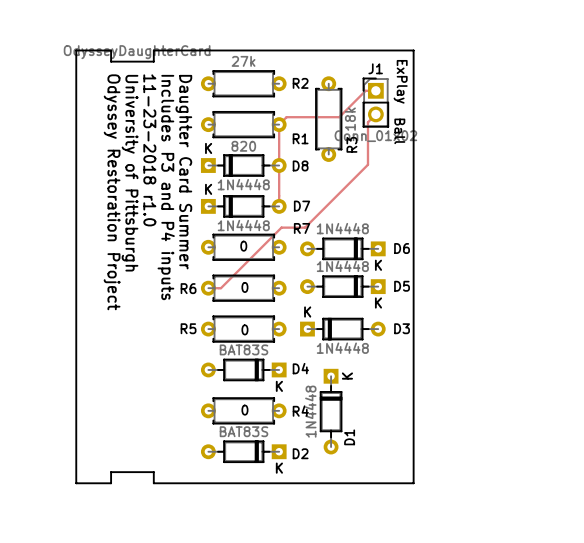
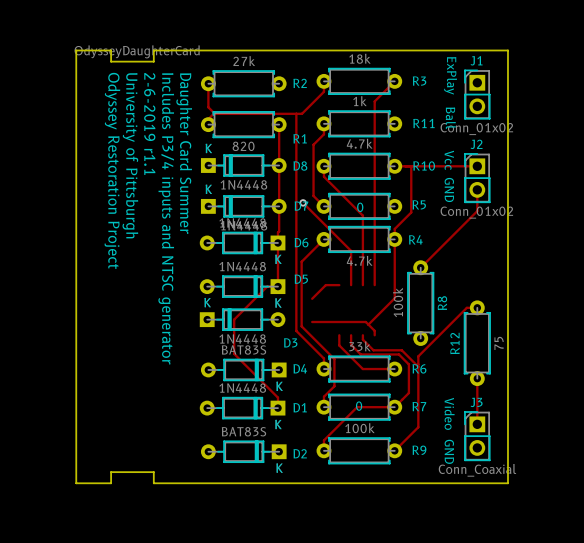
board edge: (413, 50) (413, 483) -> (413, 50) (507, 50) (507, 483) (413, 483)
track: none -> (323, 81) (323, 91) (301, 113) (213, 113) (208, 119) (208, 124)
track: none -> (394, 81) (374, 101) (374, 285)
text position: ExPlay (400, 81) -> ExPlay (450, 75)
track: none -> (208, 83) (208, 107) (214, 113)
track: (375, 90) (365, 90) (339, 117) (286, 117) (279, 124) -> none
J1 position: (375, 102) -> (477, 94)
track: none -> (296, 113) (296, 330) (323, 358) (323, 369)
track: (375, 114) (367, 122) (367, 164) (305, 227) (281, 227) (220, 288) (208, 288) -> none
R3 rotation: 0° (328, 119) -> 90° clockwise (359, 81)
R3 value position: 18k (350, 119) -> 18k (359, 58)
track: none -> (323, 123) (323, 134) (313, 144) (313, 195) (323, 206)
R11: none -> 1k (359, 123)
text position: Ball (399, 131) -> Ball (450, 118)
R3 name position: R3 (351, 144) -> R3 (419, 81)
text: 11-23-2018 r1.0 (149, 150) -> 2-6-2019 r1.1 (149, 124)
text: none -> Vcc (449, 160)
track: none -> (323, 166) (323, 176) (362, 215) (362, 285)
R10: none -> 4.7k (359, 166)
track: none -> (394, 166) (477, 166)
track: none -> (411, 166) (411, 212) (394, 228) (394, 298) (368, 324)
J2: none -> Conn_01x02 (477, 178)
text: Includes P3 and P4 inputs (166, 187) -> Includes P3/4 inputs and NTSC generator (166, 218)
text: none -> GND (449, 189)
track: none -> (477, 189) (477, 211) (420, 267)
track: none -> (303, 202) (351, 250) (351, 285)
via: none -> (303, 202)
track: none -> (279, 206) (277, 286) (267, 286) (234, 319) (234, 353) (277, 397) (277, 408)
R7 name position: R7 (302, 228) -> R7 (419, 406)
track: none -> (323, 239) (301, 261) (301, 326) (334, 359) (334, 386) (323, 396) (323, 407)
R7 position: (243, 247) -> (359, 407)
D6 position: (342, 248) -> (242, 242)
track: none -> (339, 285) (325, 285) (312, 298)
D5 position: (342, 286) -> (242, 286)
D5 name position: D5 (402, 286) -> D5 (301, 279)
R6 value: 0 (244, 287) -> 33k (359, 346)
R6 name position: R6 (188, 288) -> R6 (419, 368)
R6 position: (243, 288) -> (359, 369)
R8: none -> 100k (420, 303)
track: none -> (477, 307) (466, 307) (418, 356) (418, 427) (394, 450)
track: none -> (312, 321) (365, 321) (374, 330) (374, 335)
R5 name position: R5 (188, 328) -> R5 (419, 204)
D3 name position: D3 (402, 328) -> D3 (290, 342)
R5 position: (243, 329) -> (359, 206)
D3 position: (342, 329) -> (242, 319)
track: none -> (339, 335) (339, 345) (362, 369) (394, 369)
track: none -> (351, 335) (351, 344) (360, 354) (398, 354) (408, 364) (408, 393) (394, 407) (357, 407) (323, 440) (323, 450)
track: none -> (362, 335) (362, 339) (373, 350) (401, 350) (418, 366)
R12: none -> 75 (477, 343)
track: none -> (477, 378) (477, 424)
R4 position: (243, 410) -> (359, 239)
R4 value: 0 (244, 410) -> 4.7k (359, 260)
D1 rotation: 0° (331, 411) -> 90° clockwise (242, 408)
D1 position: (331, 411) -> (242, 408)
text: none -> Video (449, 413)
J3: none -> Conn_Coaxial (477, 436)
D1 name position: D1 (349, 437) -> D1 (300, 407)
R9: none -> 100k (359, 450)
text: none -> GND (449, 451)

